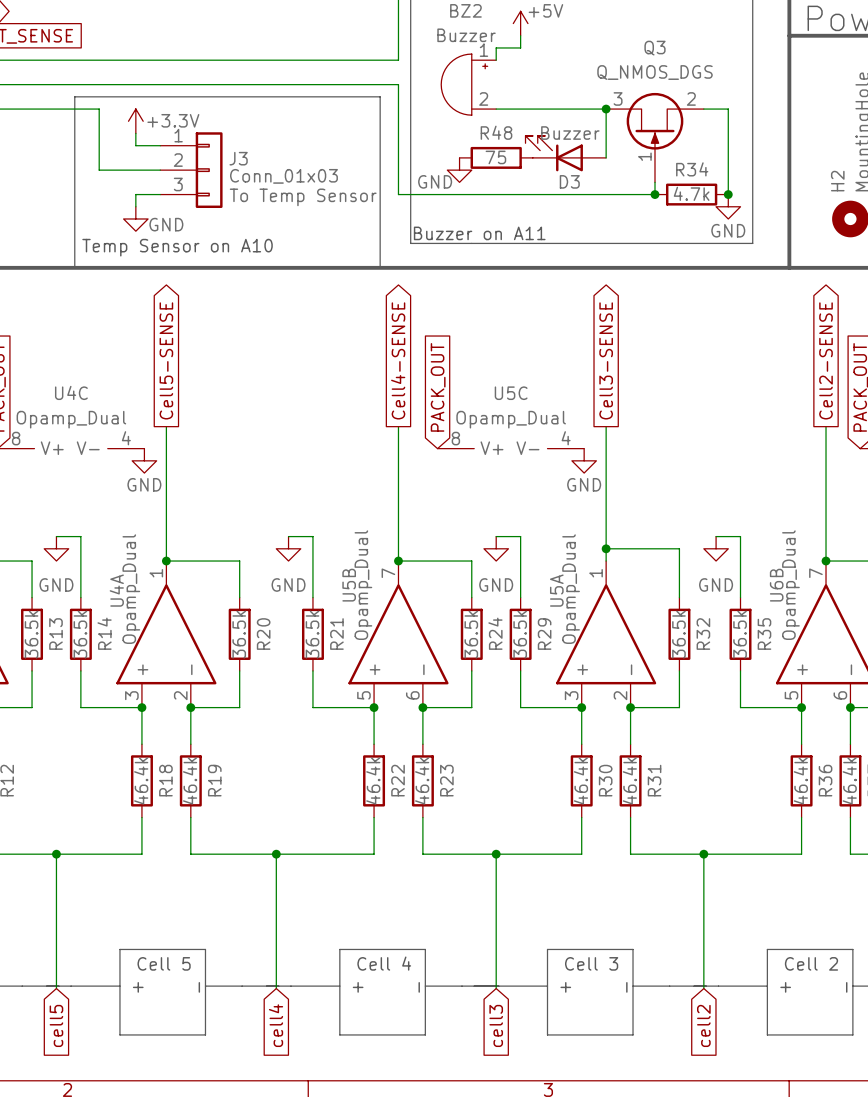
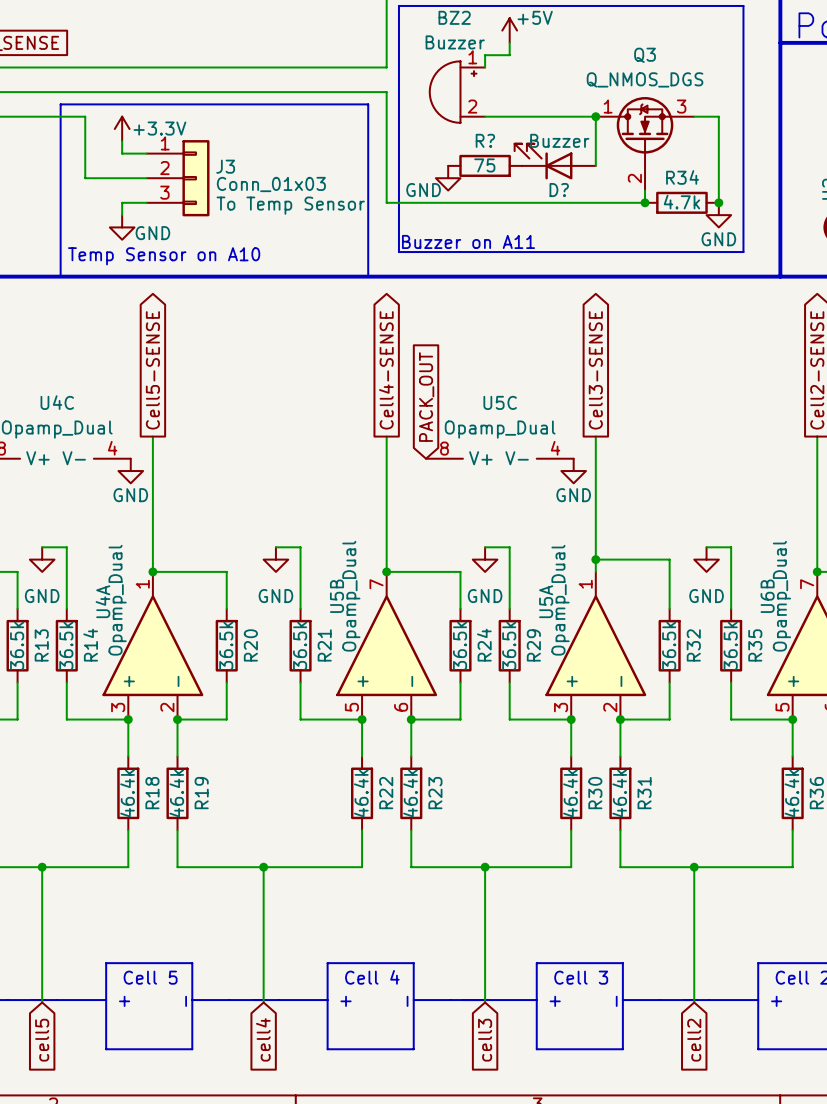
Q3 symbol: [606, 92, 704, 183] -> [595, 97, 695, 191]
R48 name: R48 (496, 132) -> R? (485, 140)
D3 name: D3 (569, 181) -> D? (559, 190)

